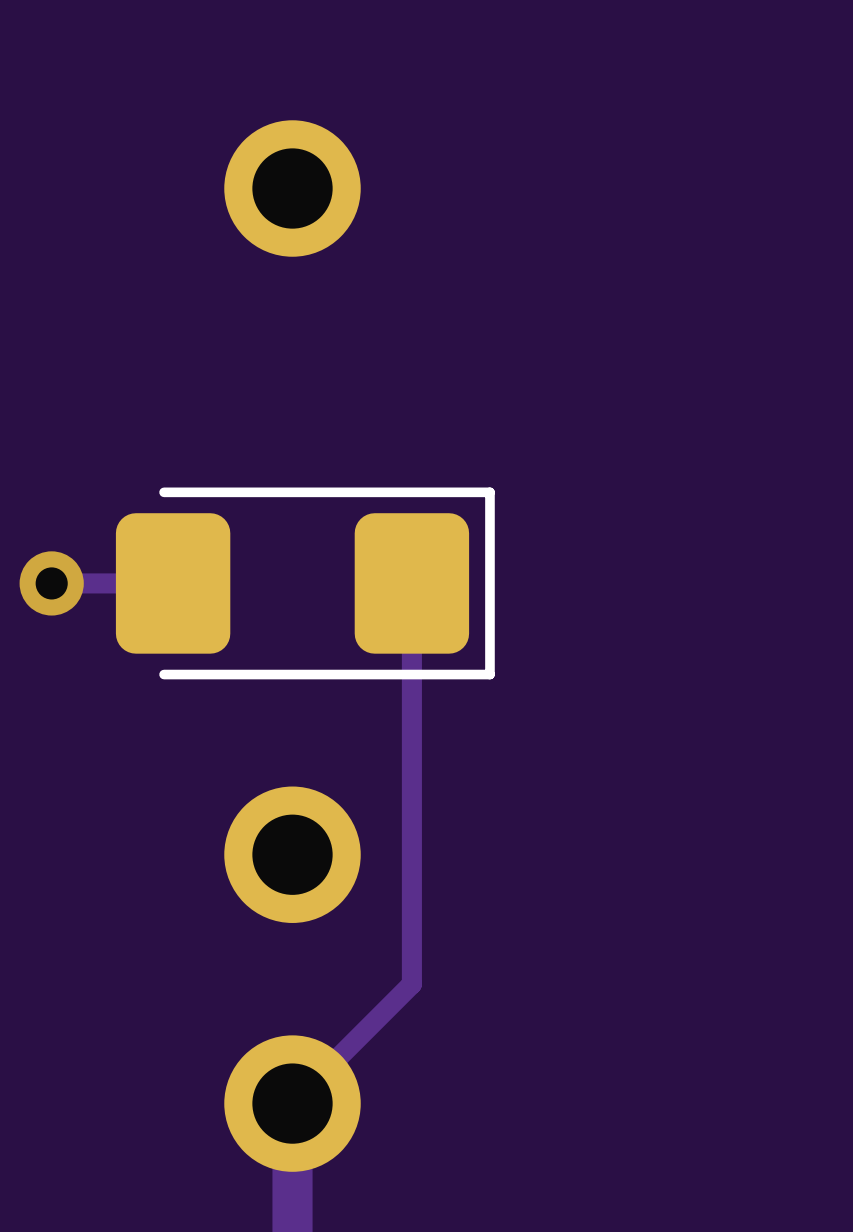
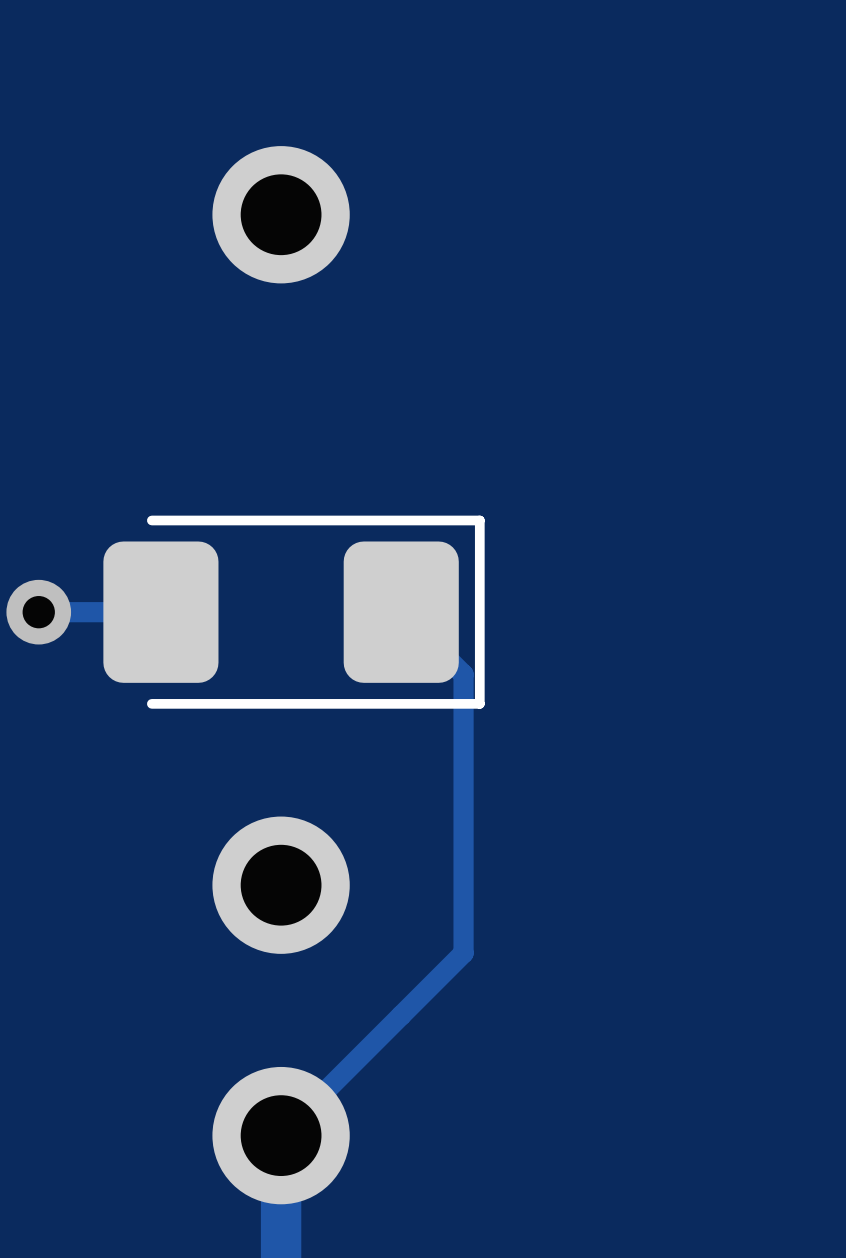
track: (411, 583) (411, 984) (292, 1103) -> (401, 612) (463, 674) (463, 953) (281, 1135)

